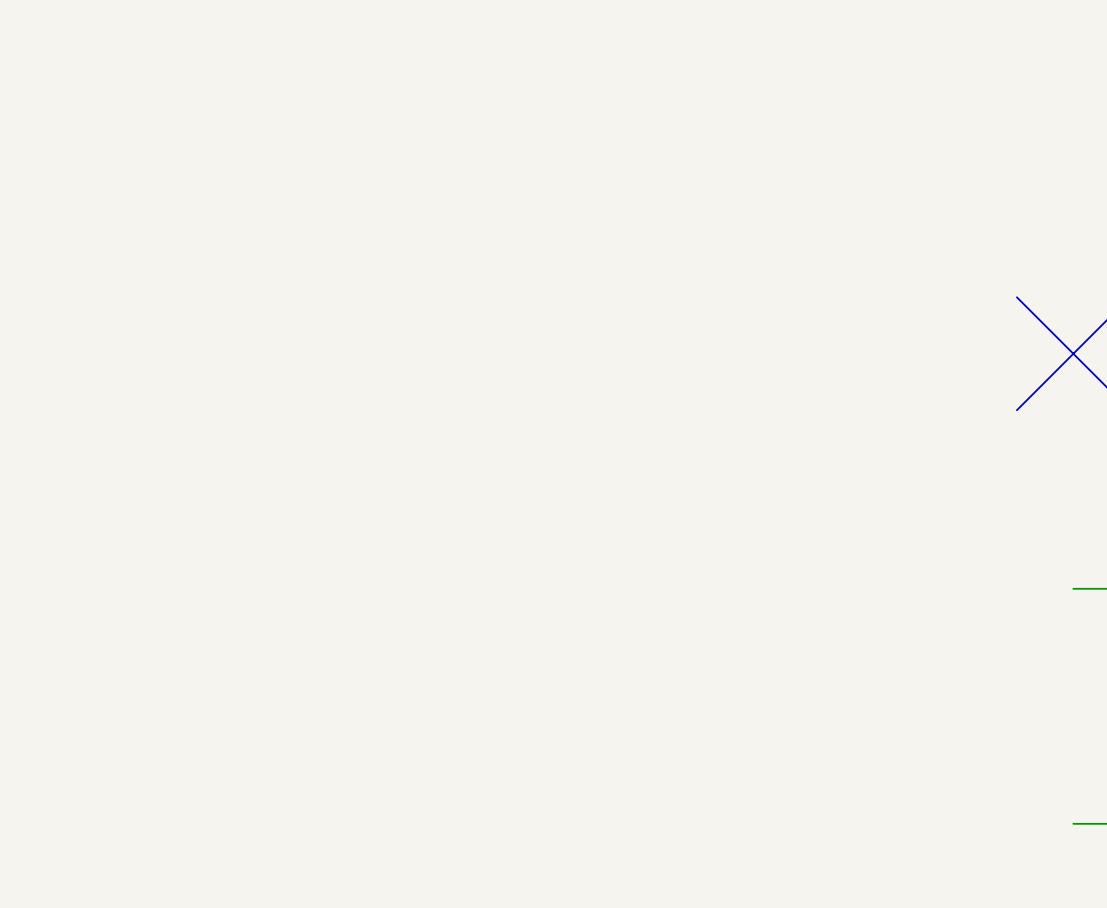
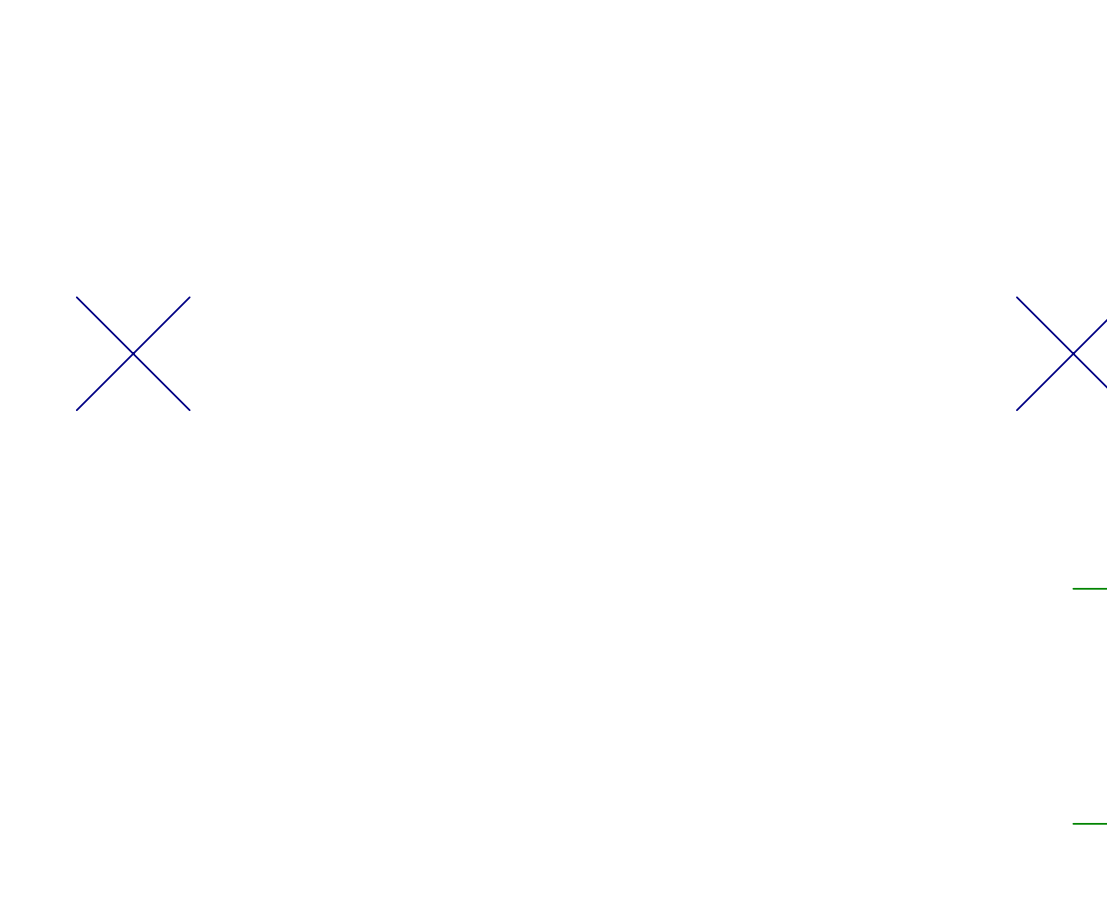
no-connect mark: none -> (133, 353)

